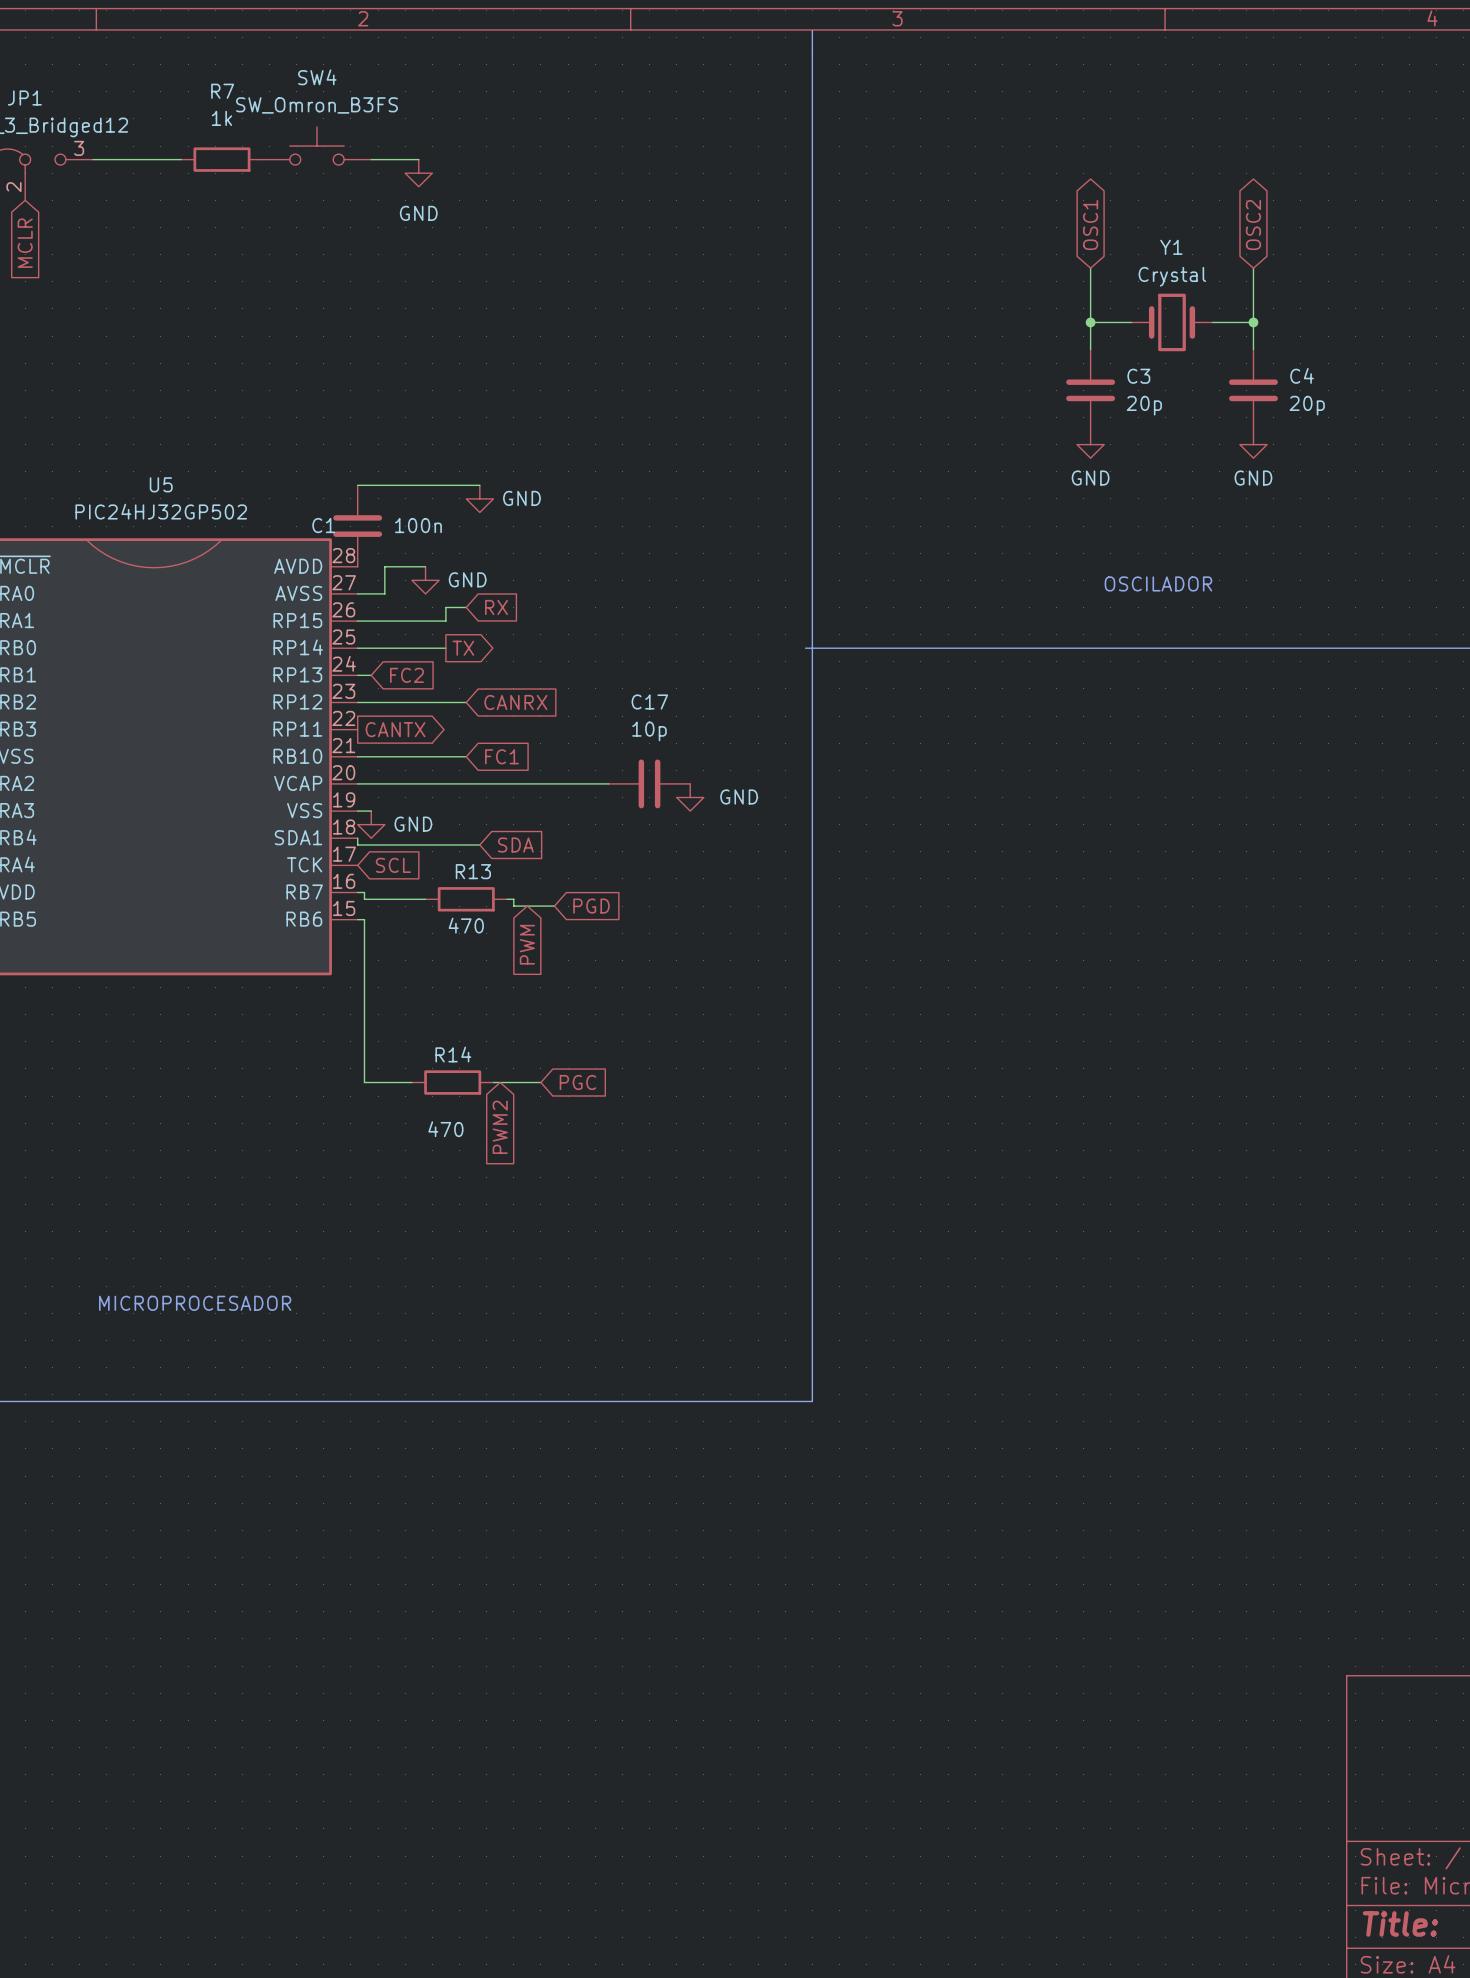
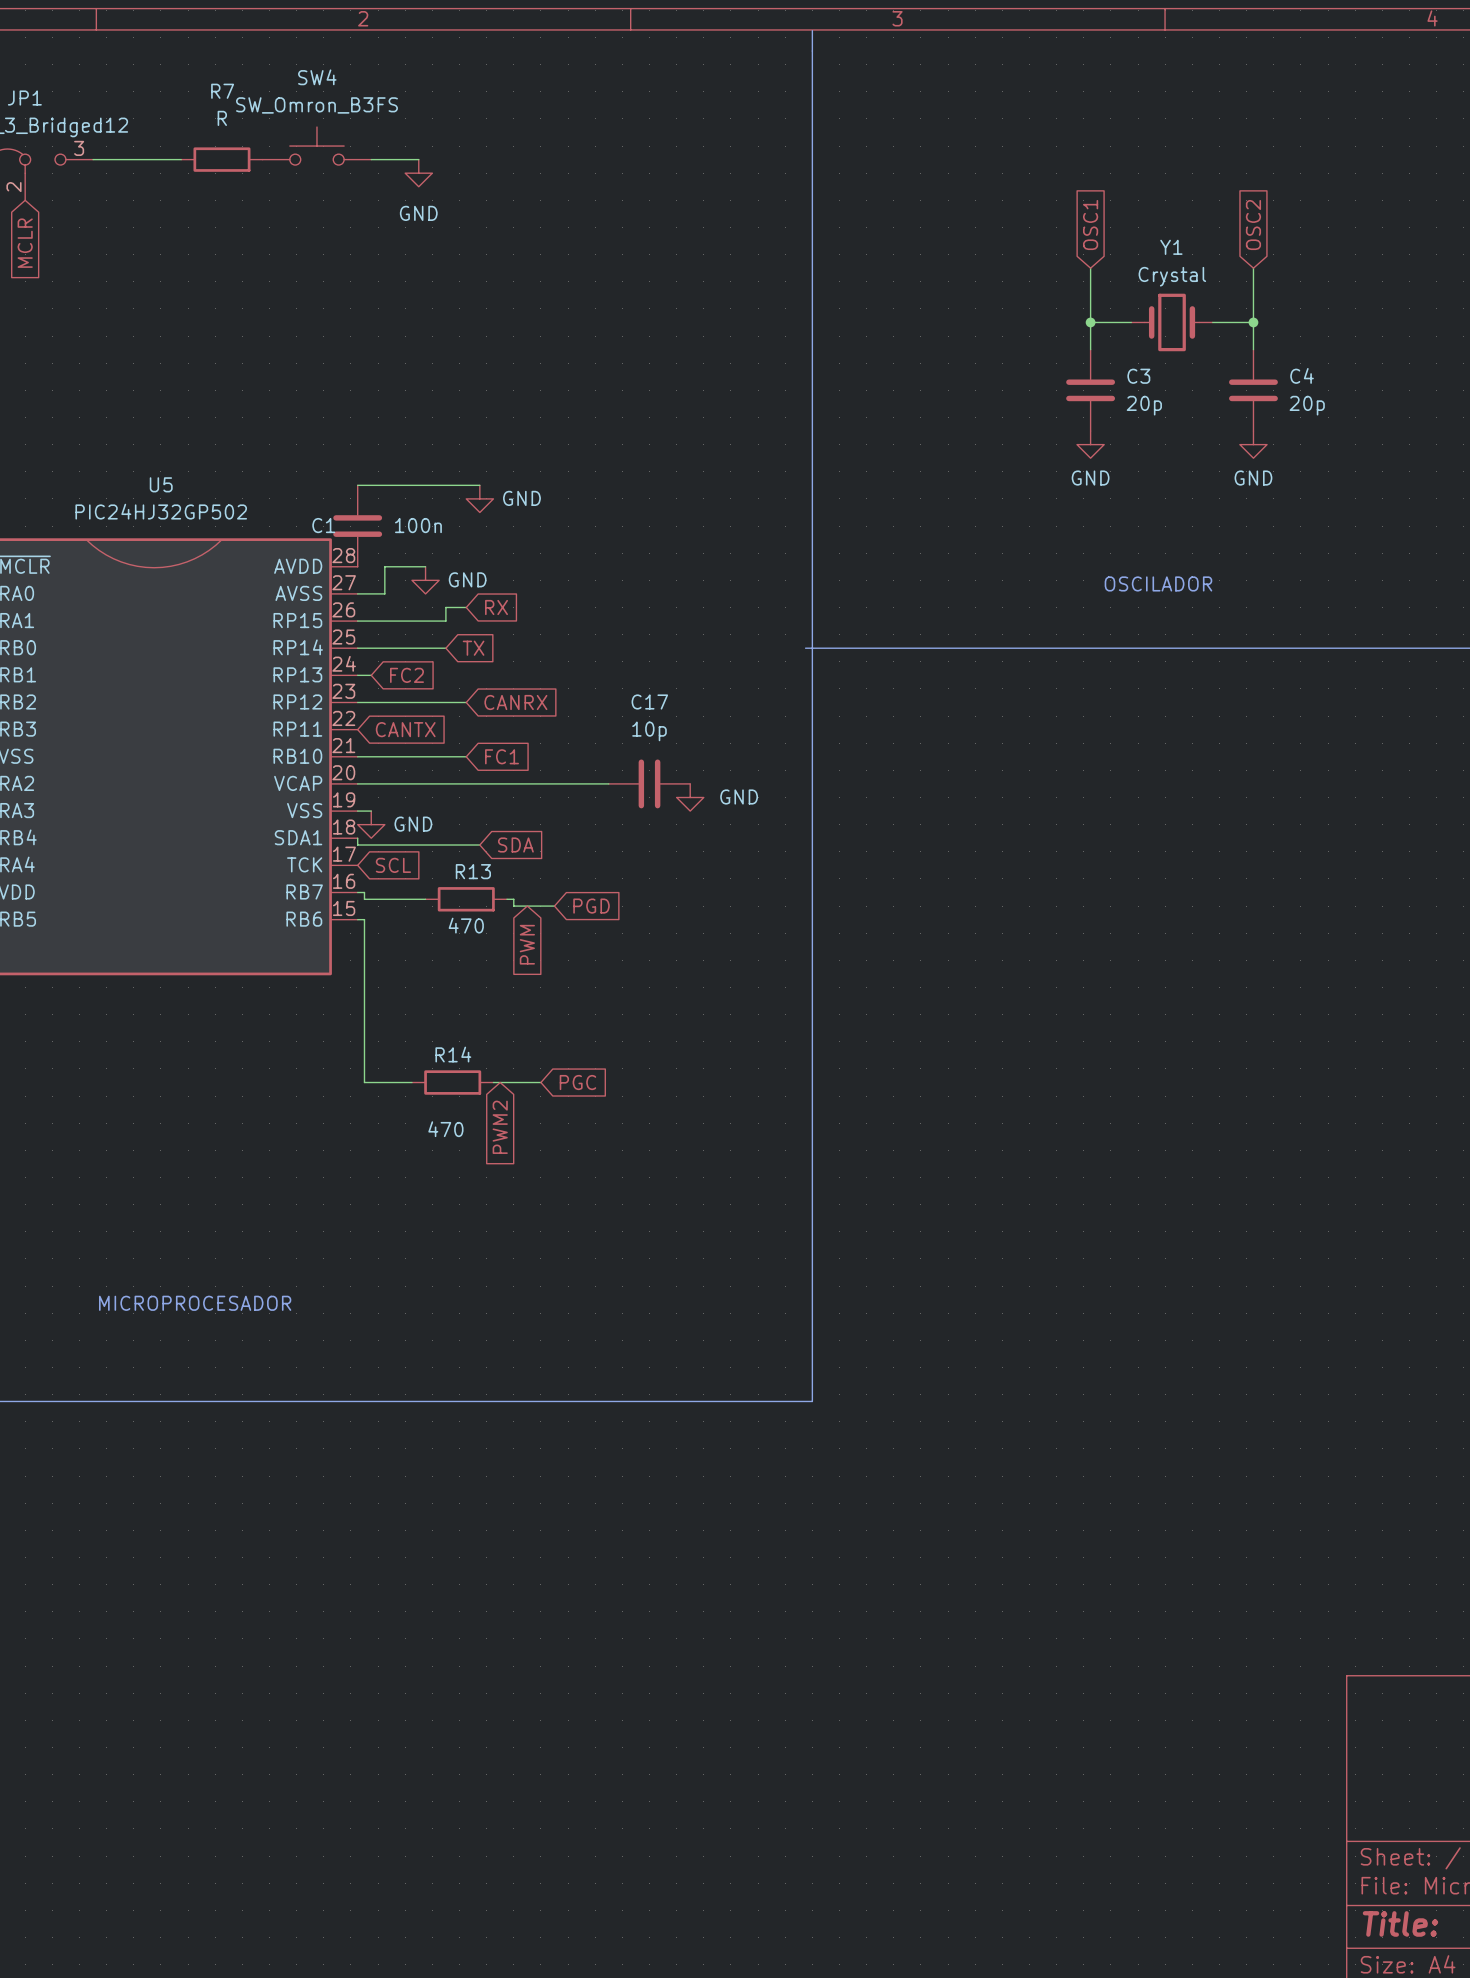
R7 value: 1k (221, 118) -> R (222, 118)
global label shape: bidirectional (1090, 225) -> input (1090, 225)
global label shape: bidirectional (1253, 225) -> input (1253, 225)
global label shape: output (463, 648) -> input (473, 648)
global label shape: output (395, 729) -> input (405, 729)

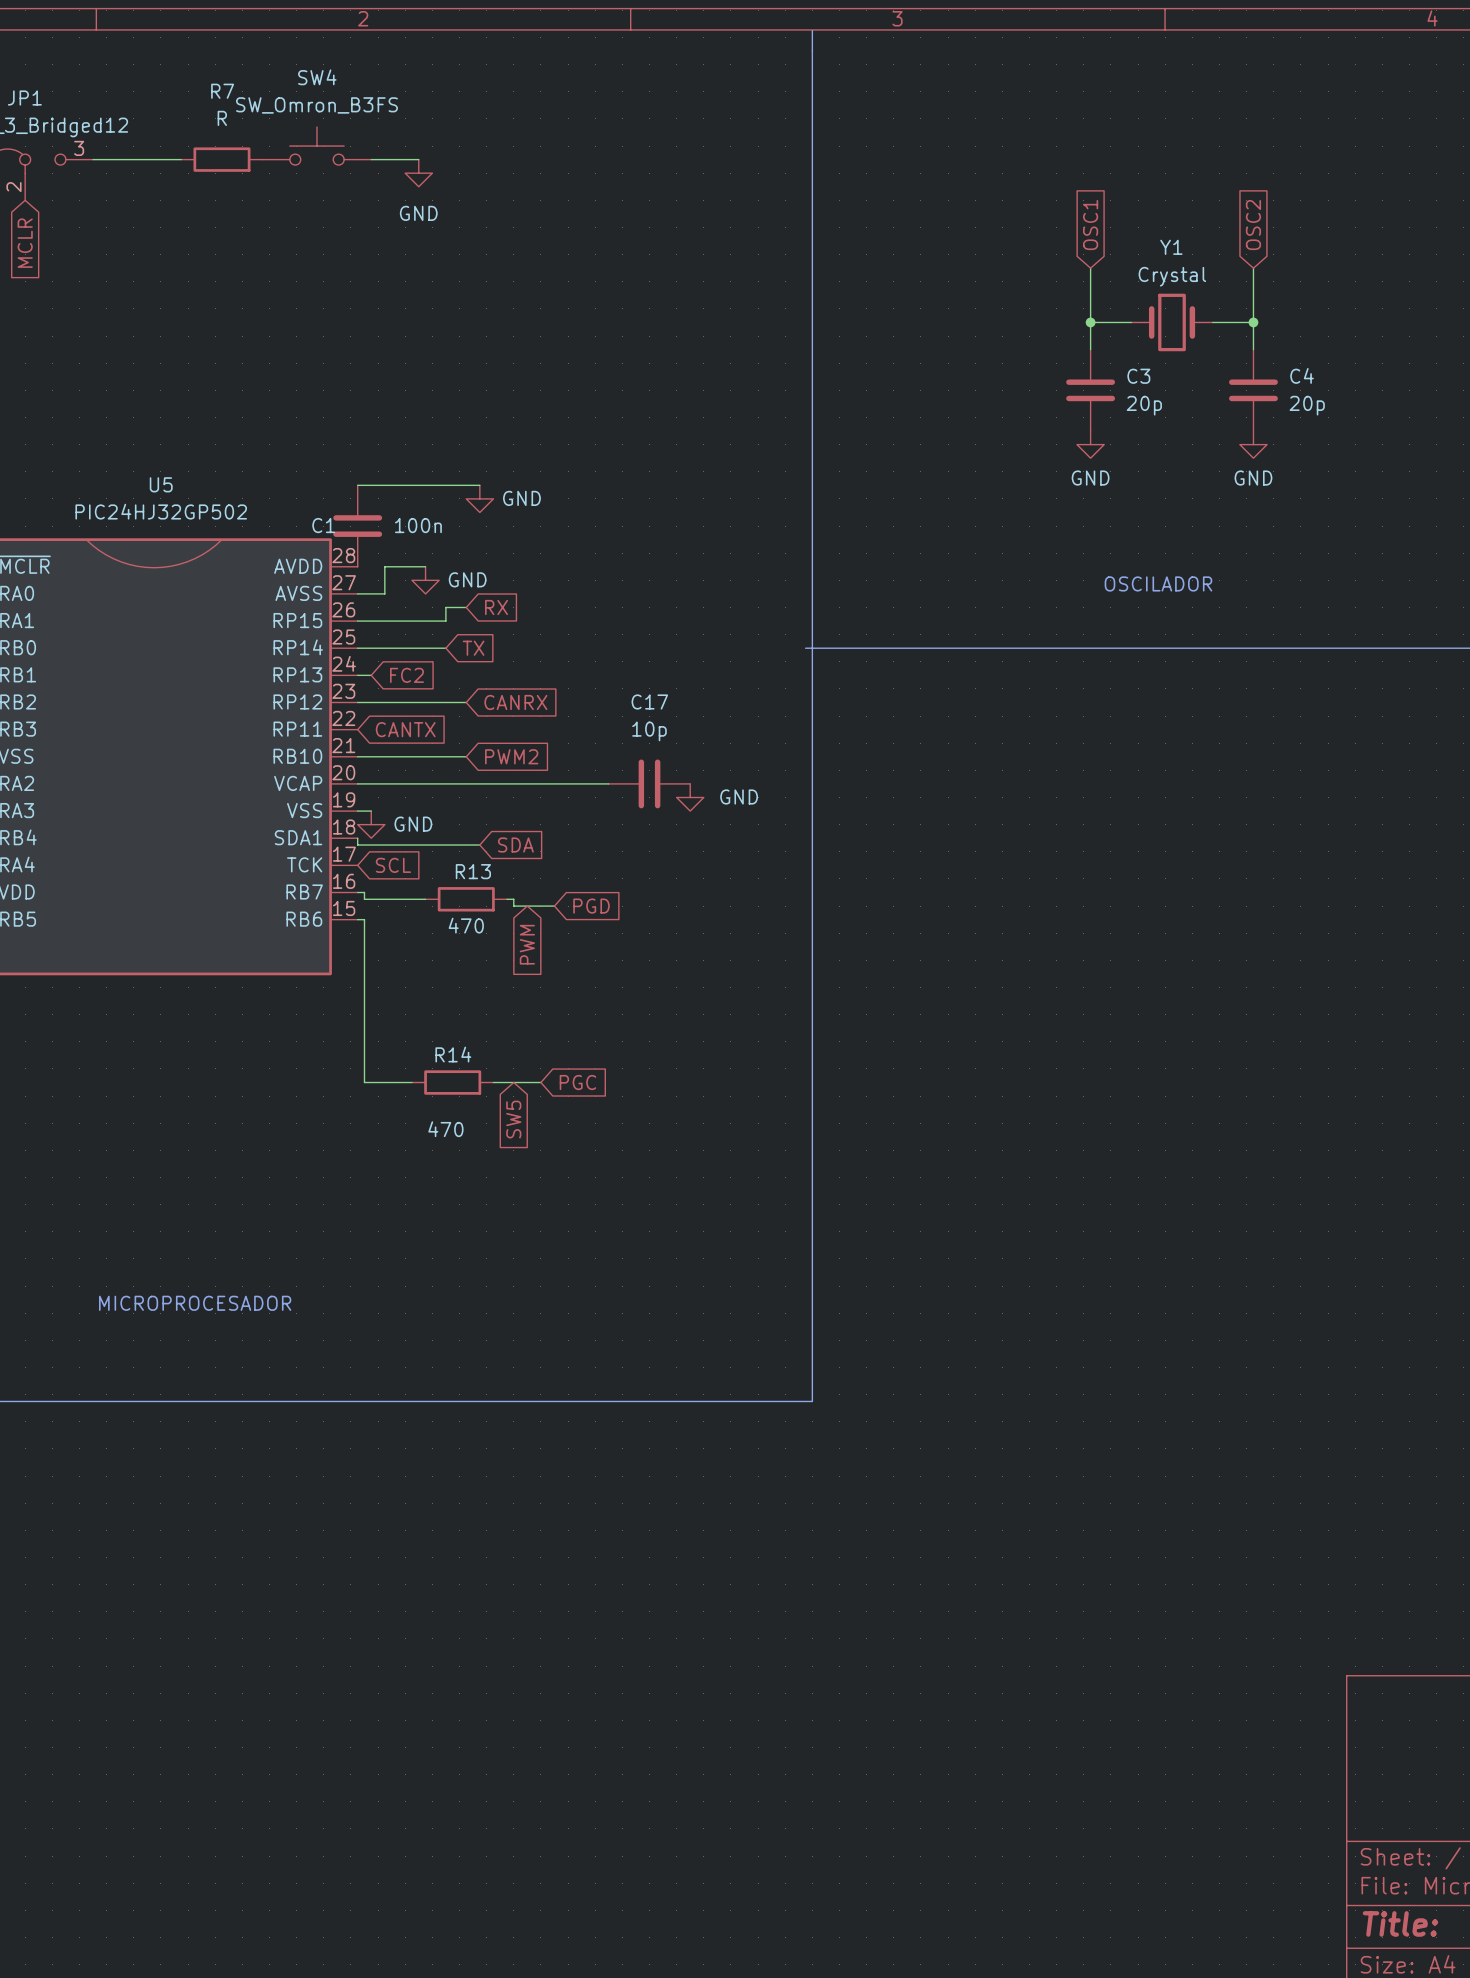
global label: FC1 (502, 756) -> PWM2 (511, 756)
global label: none -> SW5 (513, 1119)
global label: PWM2 (500, 1127) -> none

